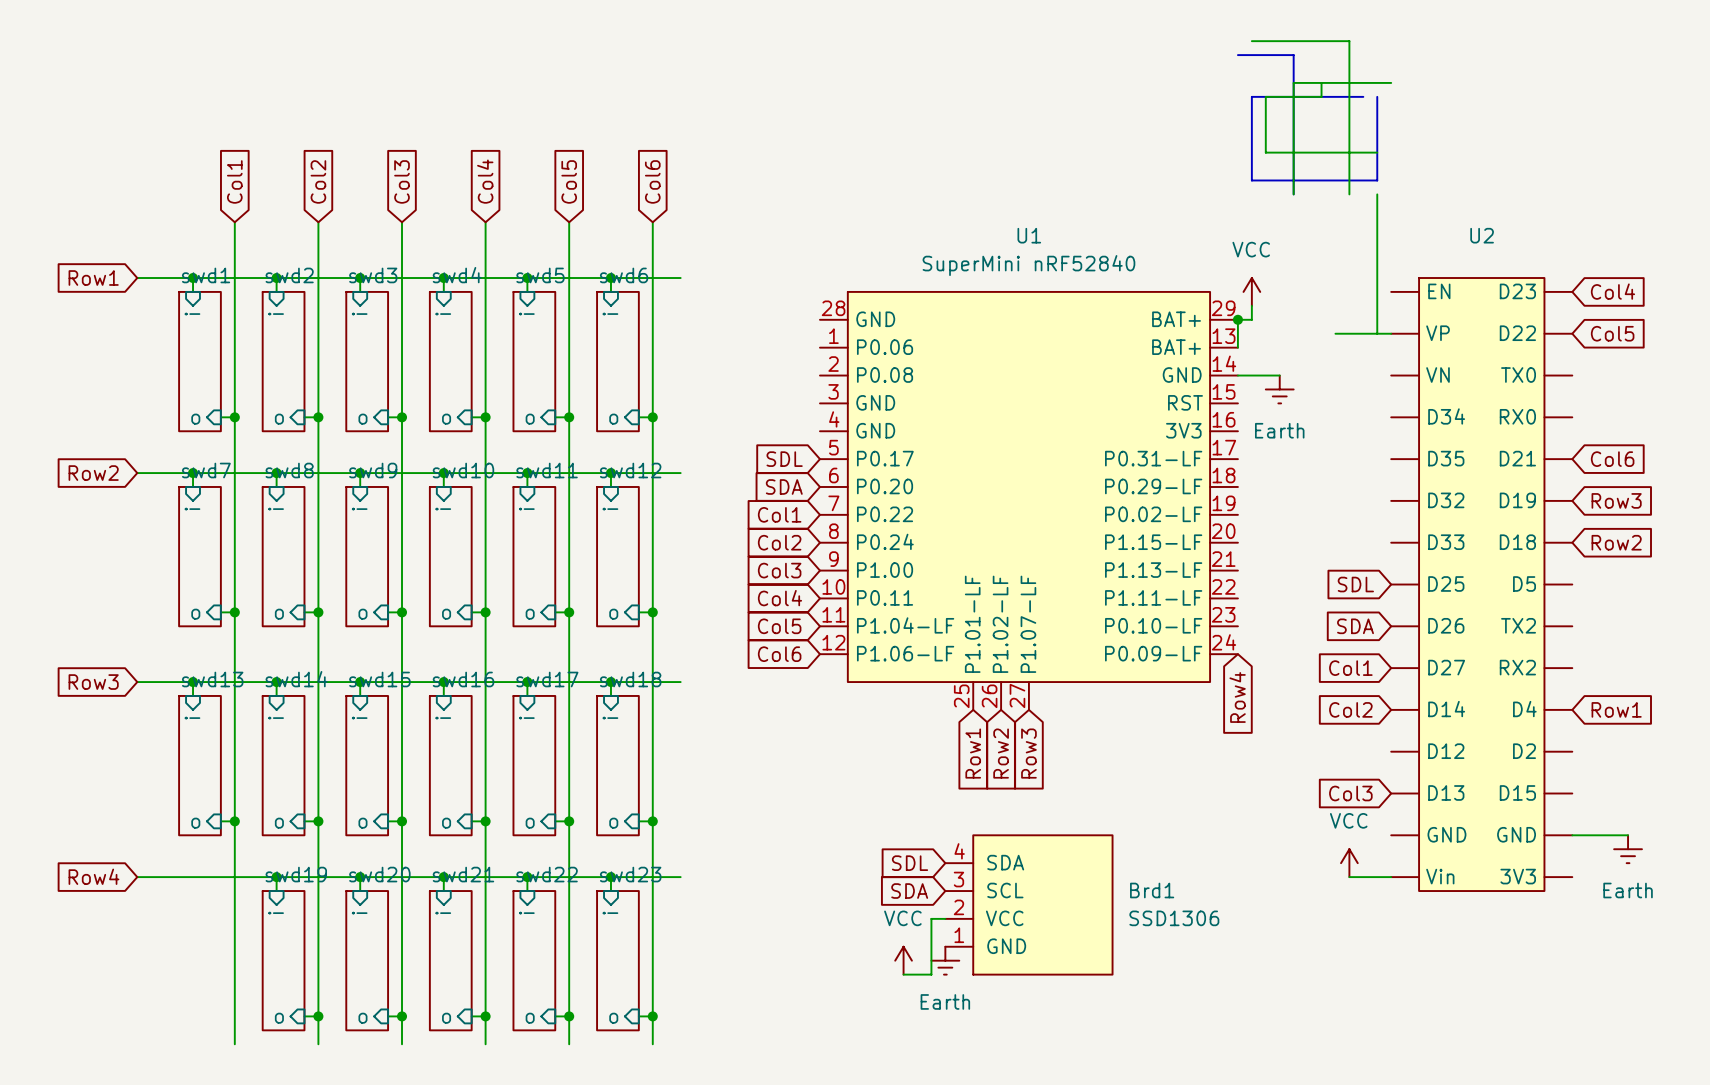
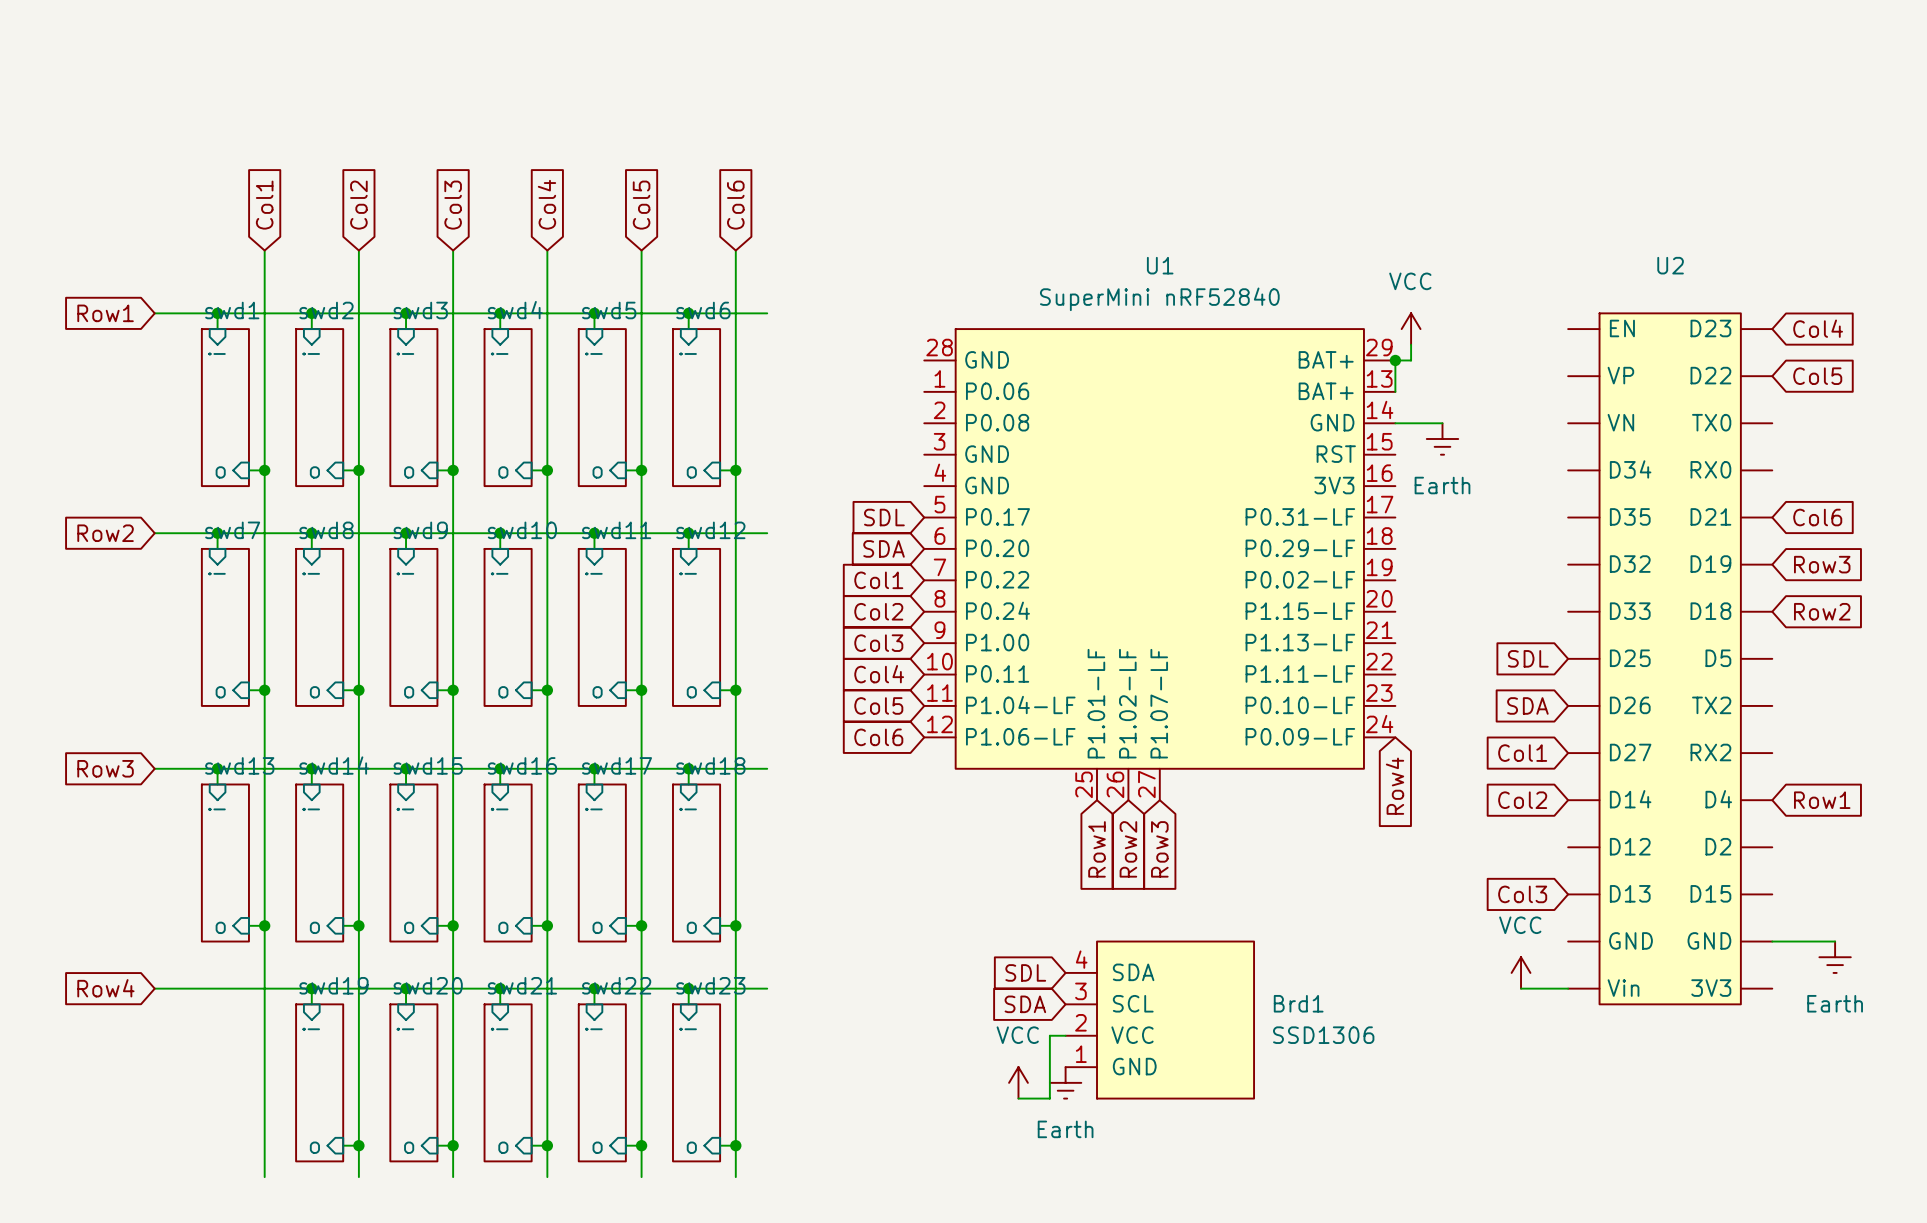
wire: (1251, 41) (1349, 41) (1349, 194) -> none
bus: (1237, 55) (1293, 55) (1293, 194) -> none
wire: (1321, 82) (1321, 96) (1265, 96) (1265, 152) (1377, 152) -> none
wire: (1391, 82) (1293, 82) (1293, 194) -> none
bus: (1363, 96) (1251, 96) (1251, 180) (1377, 180) (1377, 96) -> none
wire: (1377, 194) (1377, 333) -> none
wire: (1335, 333) (1391, 333) -> none

